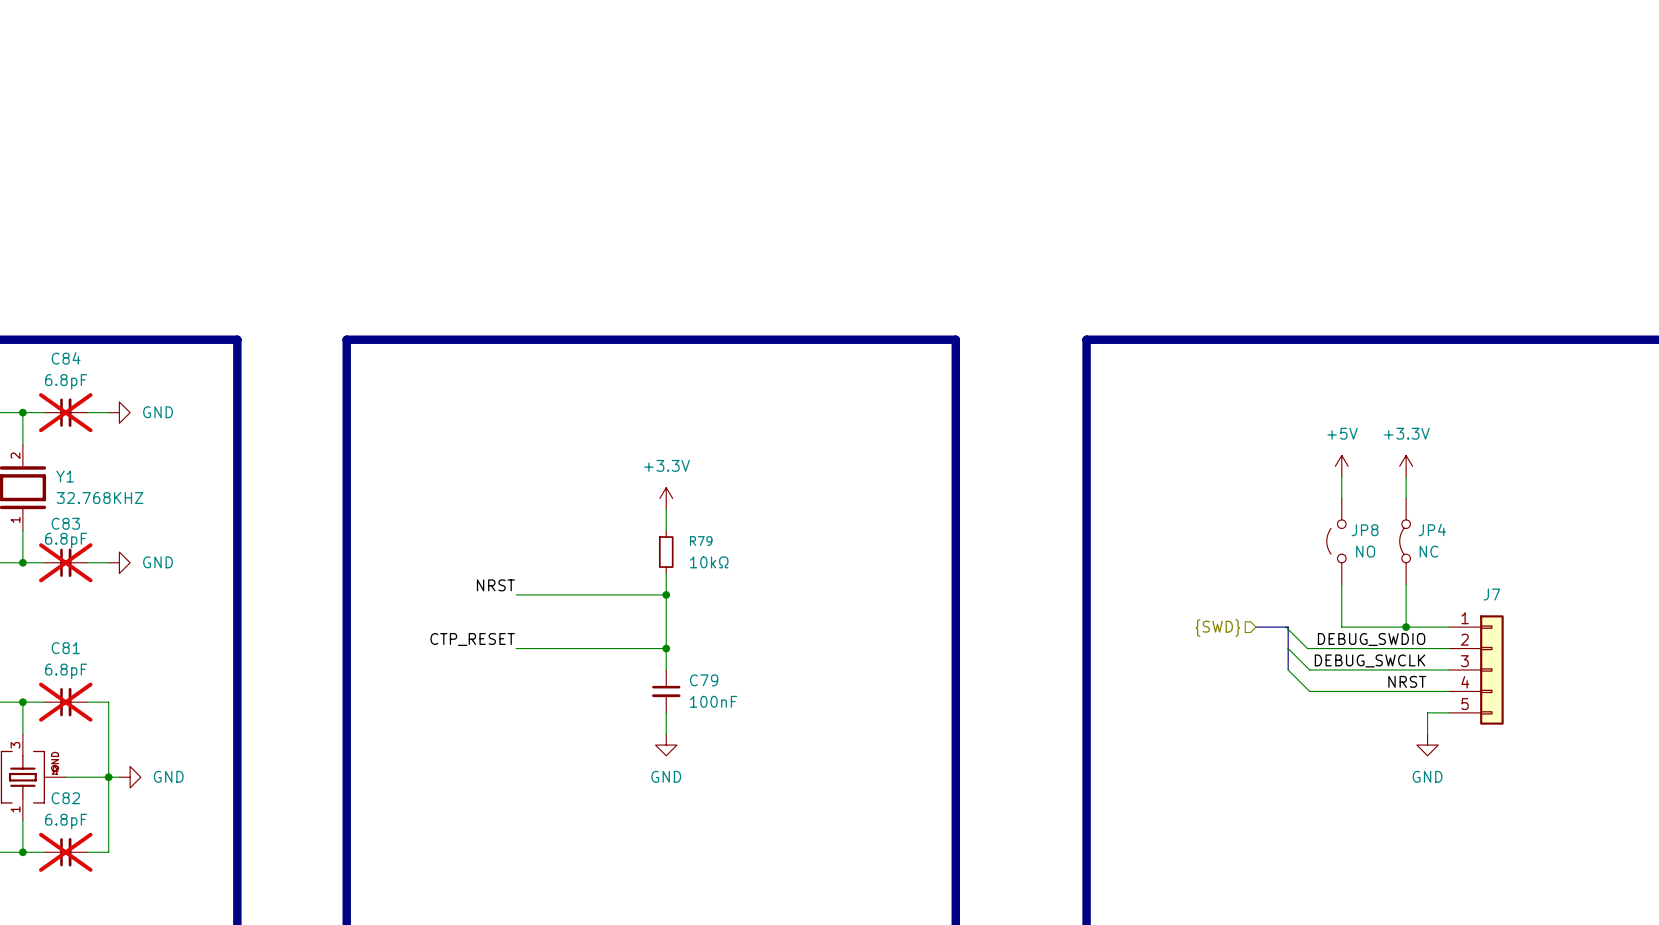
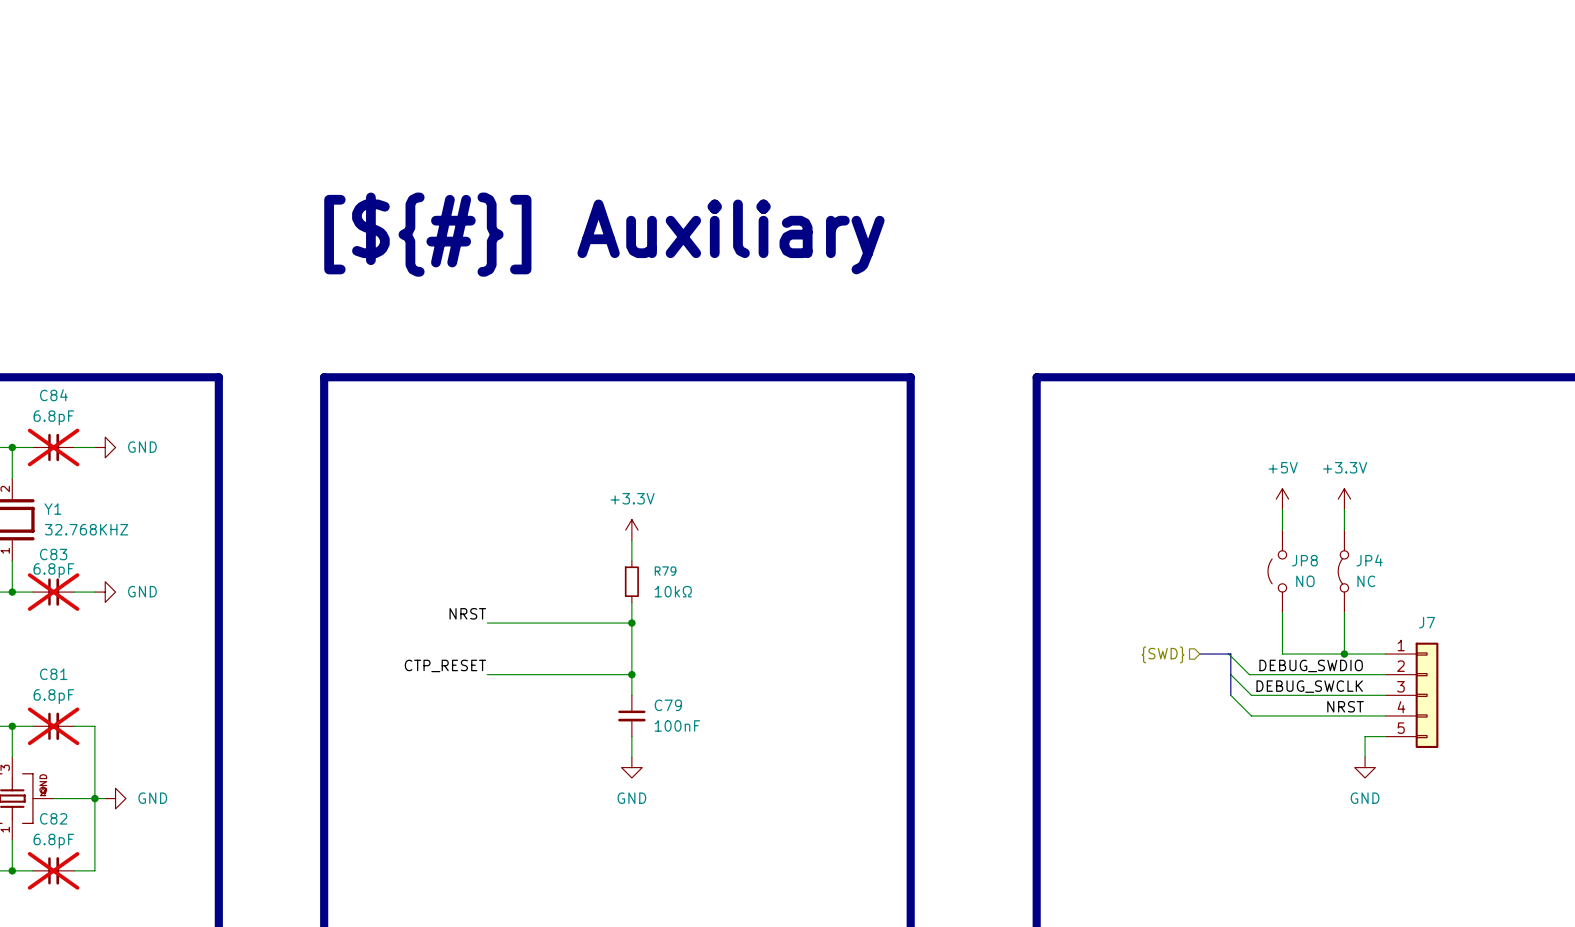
text: none -> [${#}] Auxiliary (604, 234)

